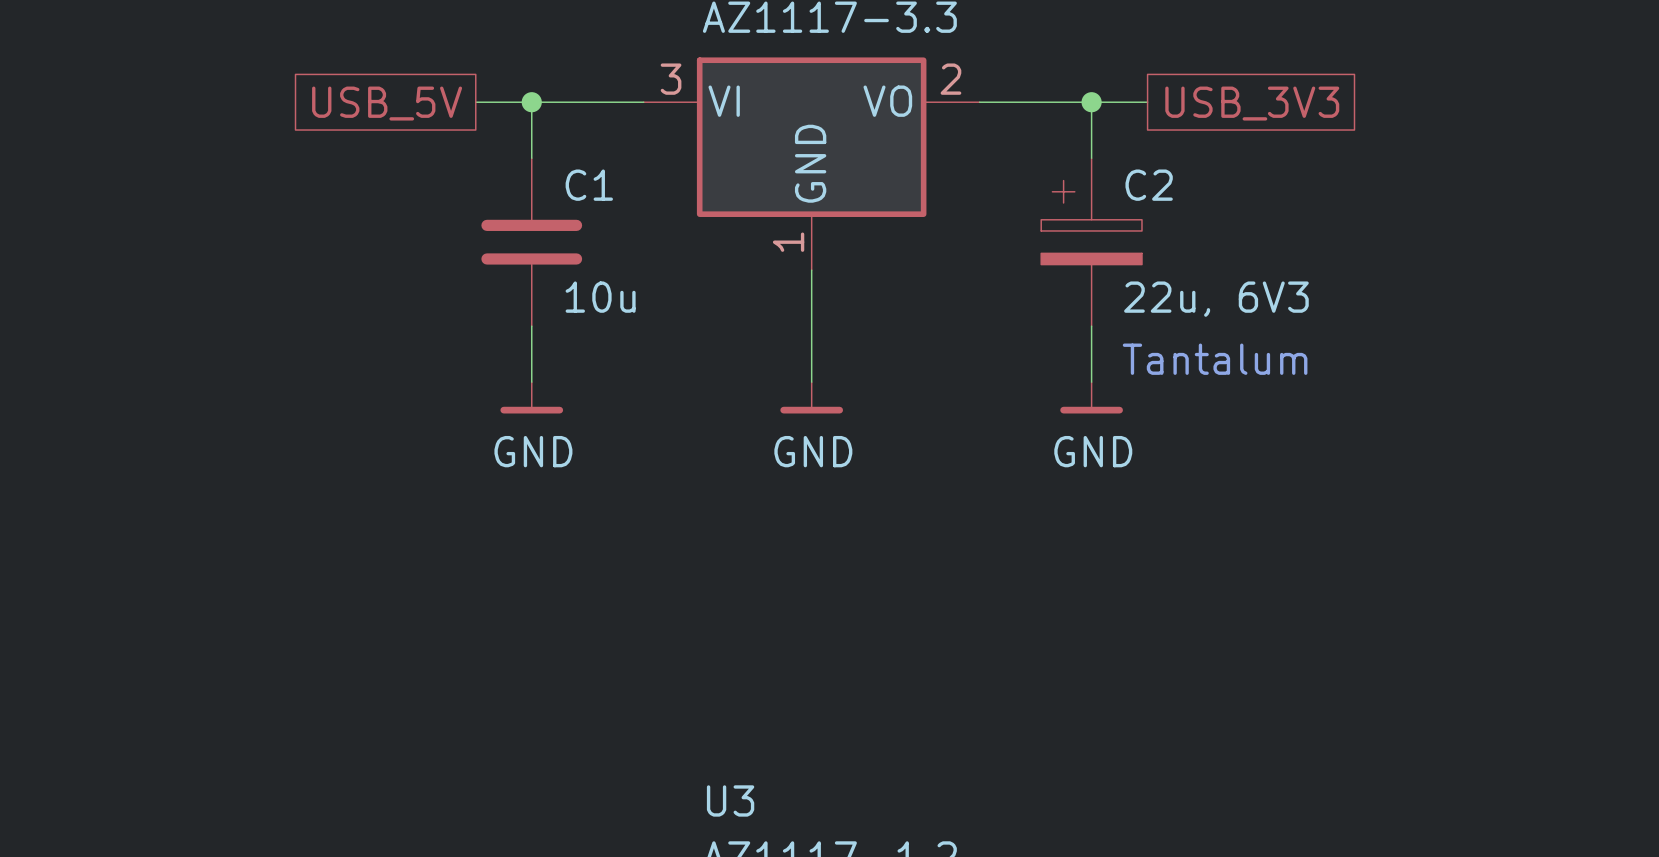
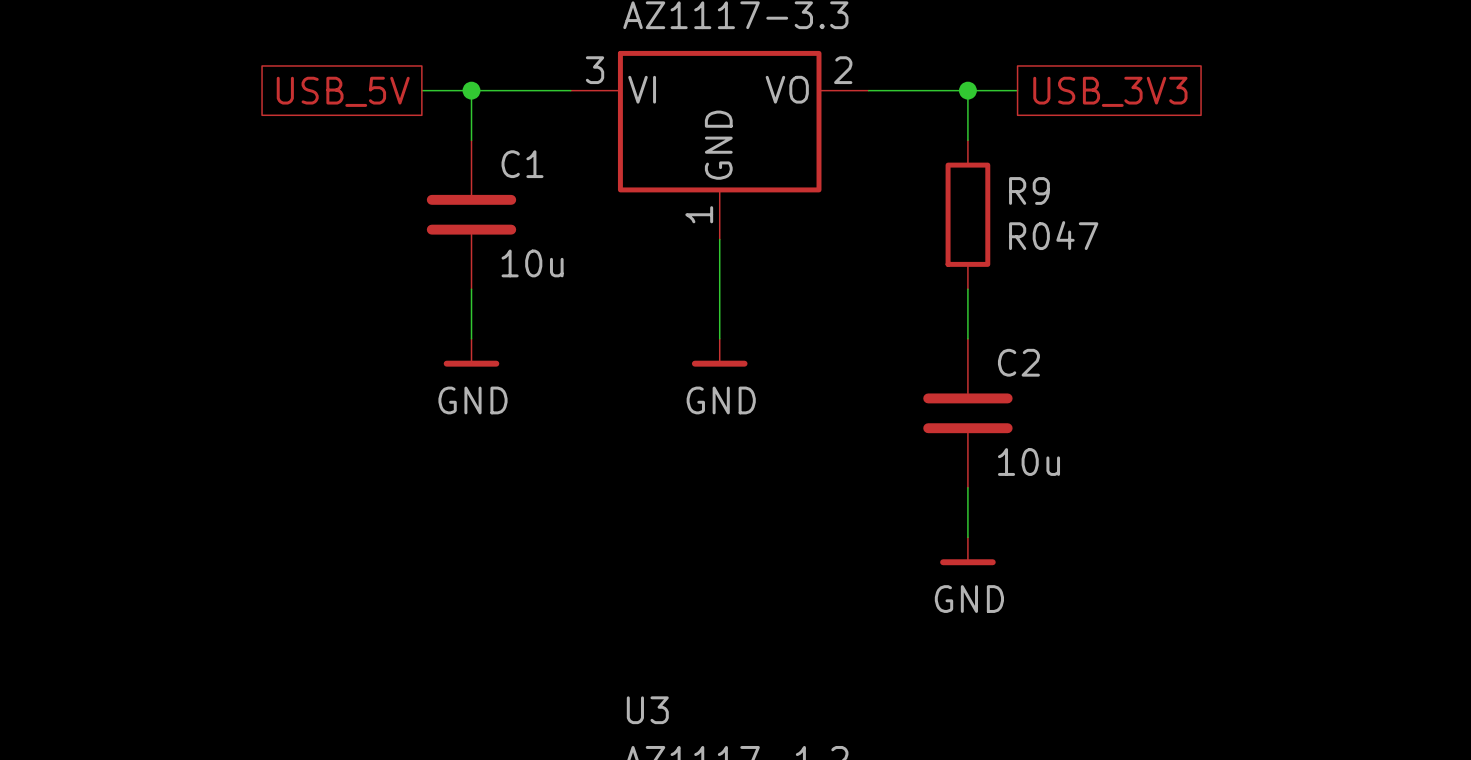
C2 symbol: [1041, 158, 1142, 327] -> [923, 338, 1013, 488]
R9: none -> R047 (967, 214)
C2 value: 22u, 6V3 (1216, 299) -> 10u (1028, 462)
text: Tantalum (1215, 359) -> none
power symbol position: GND (1091, 397) -> GND (967, 551)
wire: none -> (967, 487) (967, 537)

